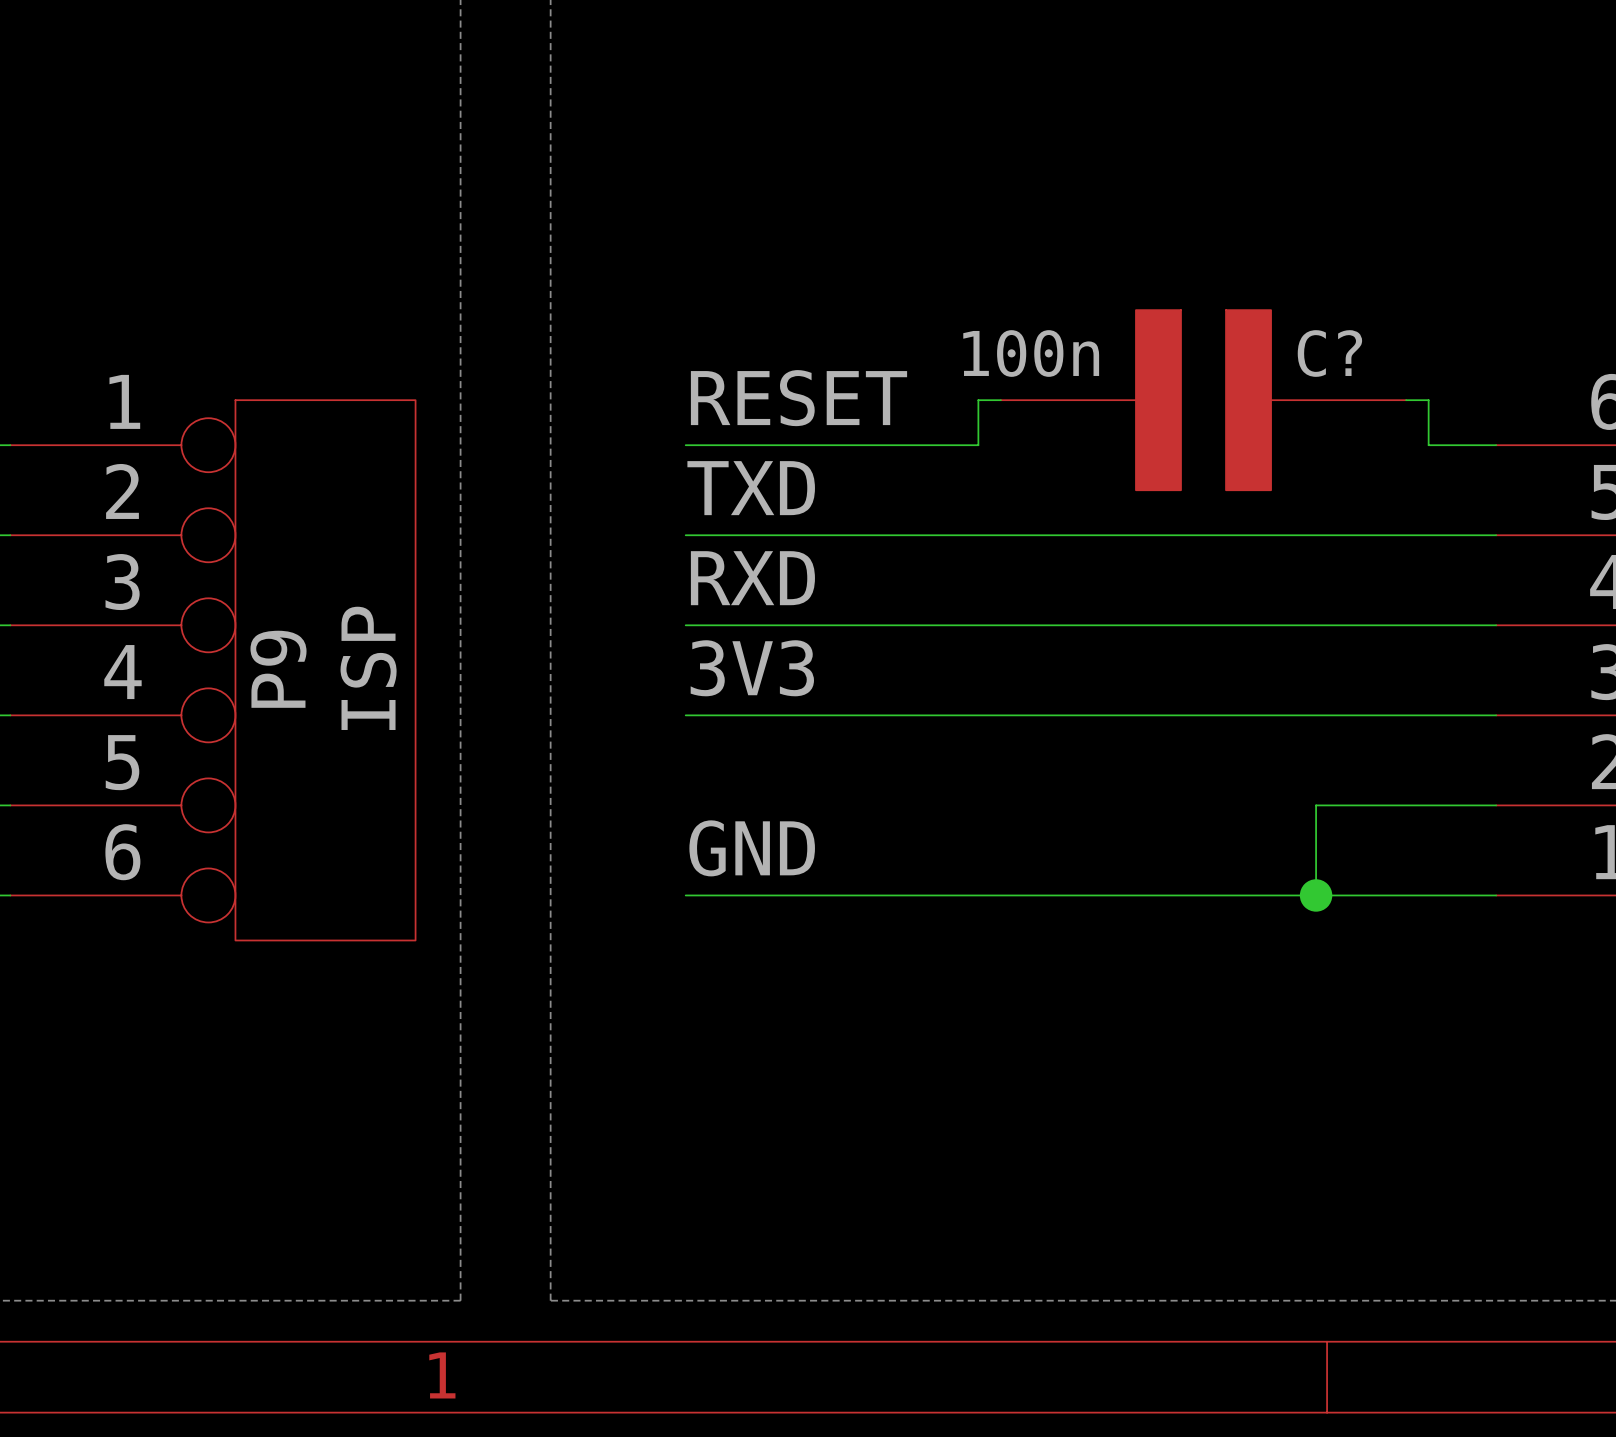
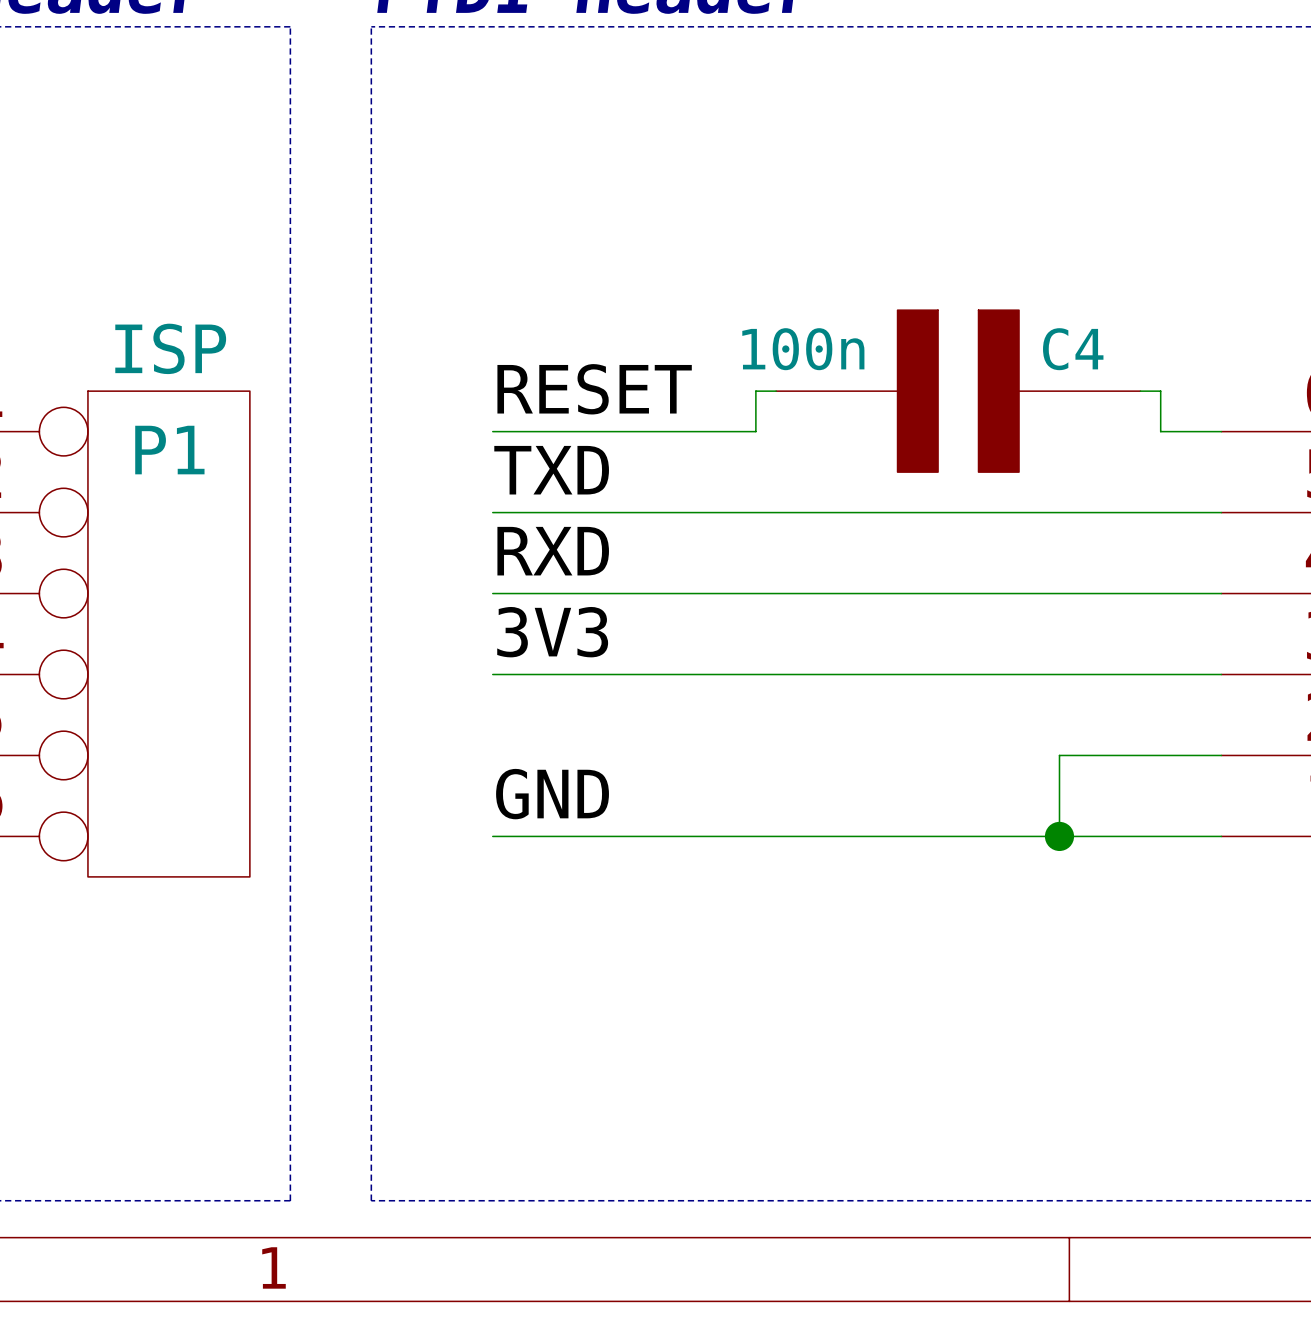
C? name: C? (1329, 353) -> C4 (1073, 349)
P9 value rotation: 0° (368, 668) -> 90° clockwise (170, 348)
P9 value position: ISP (368, 668) -> ISP (170, 348)
P9 name: P9 (278, 669) -> P1 (169, 450)

